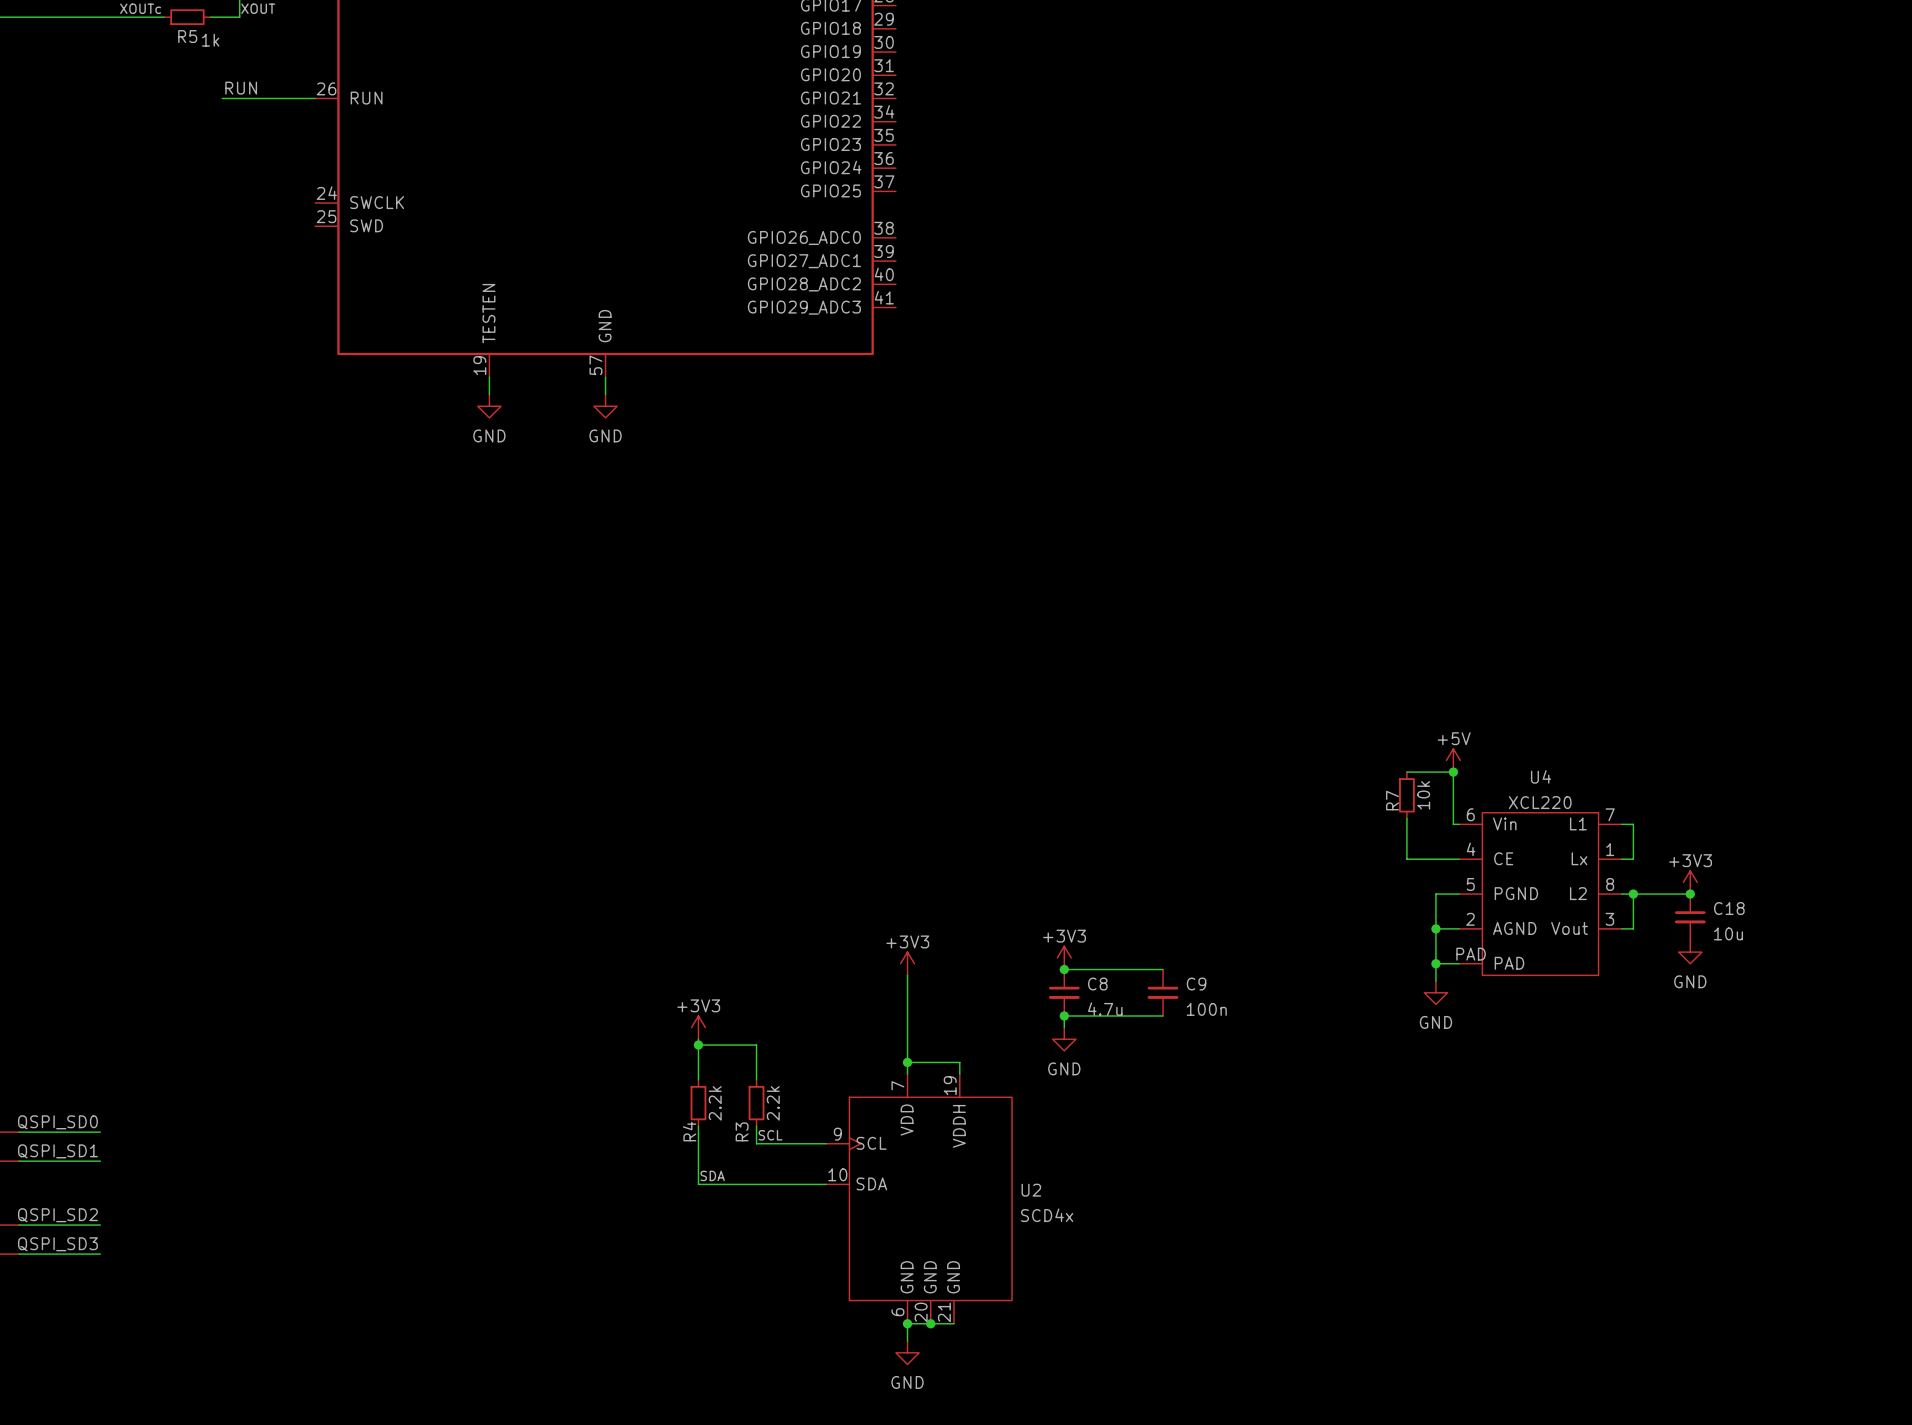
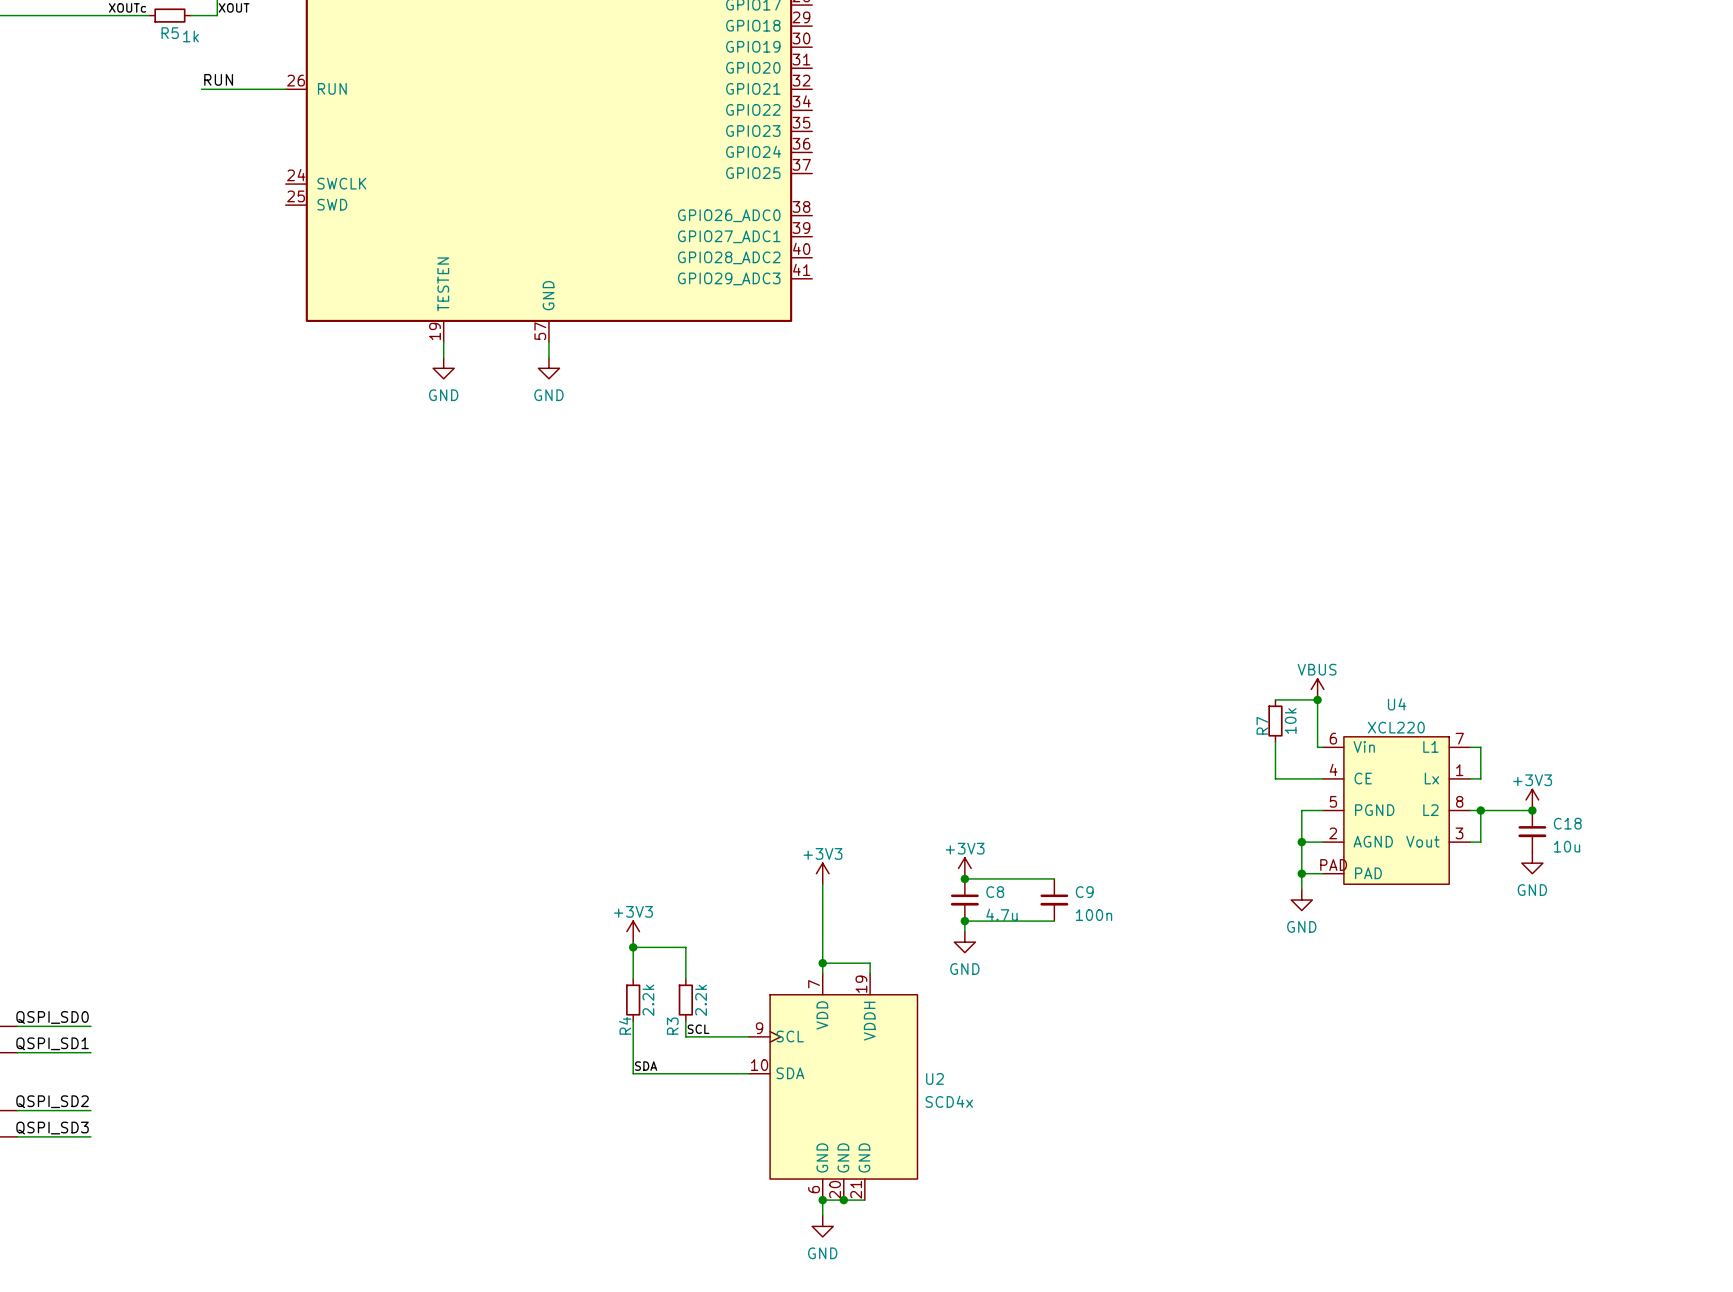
power symbol: +5V (1453, 760) -> VBUS (1317, 689)

